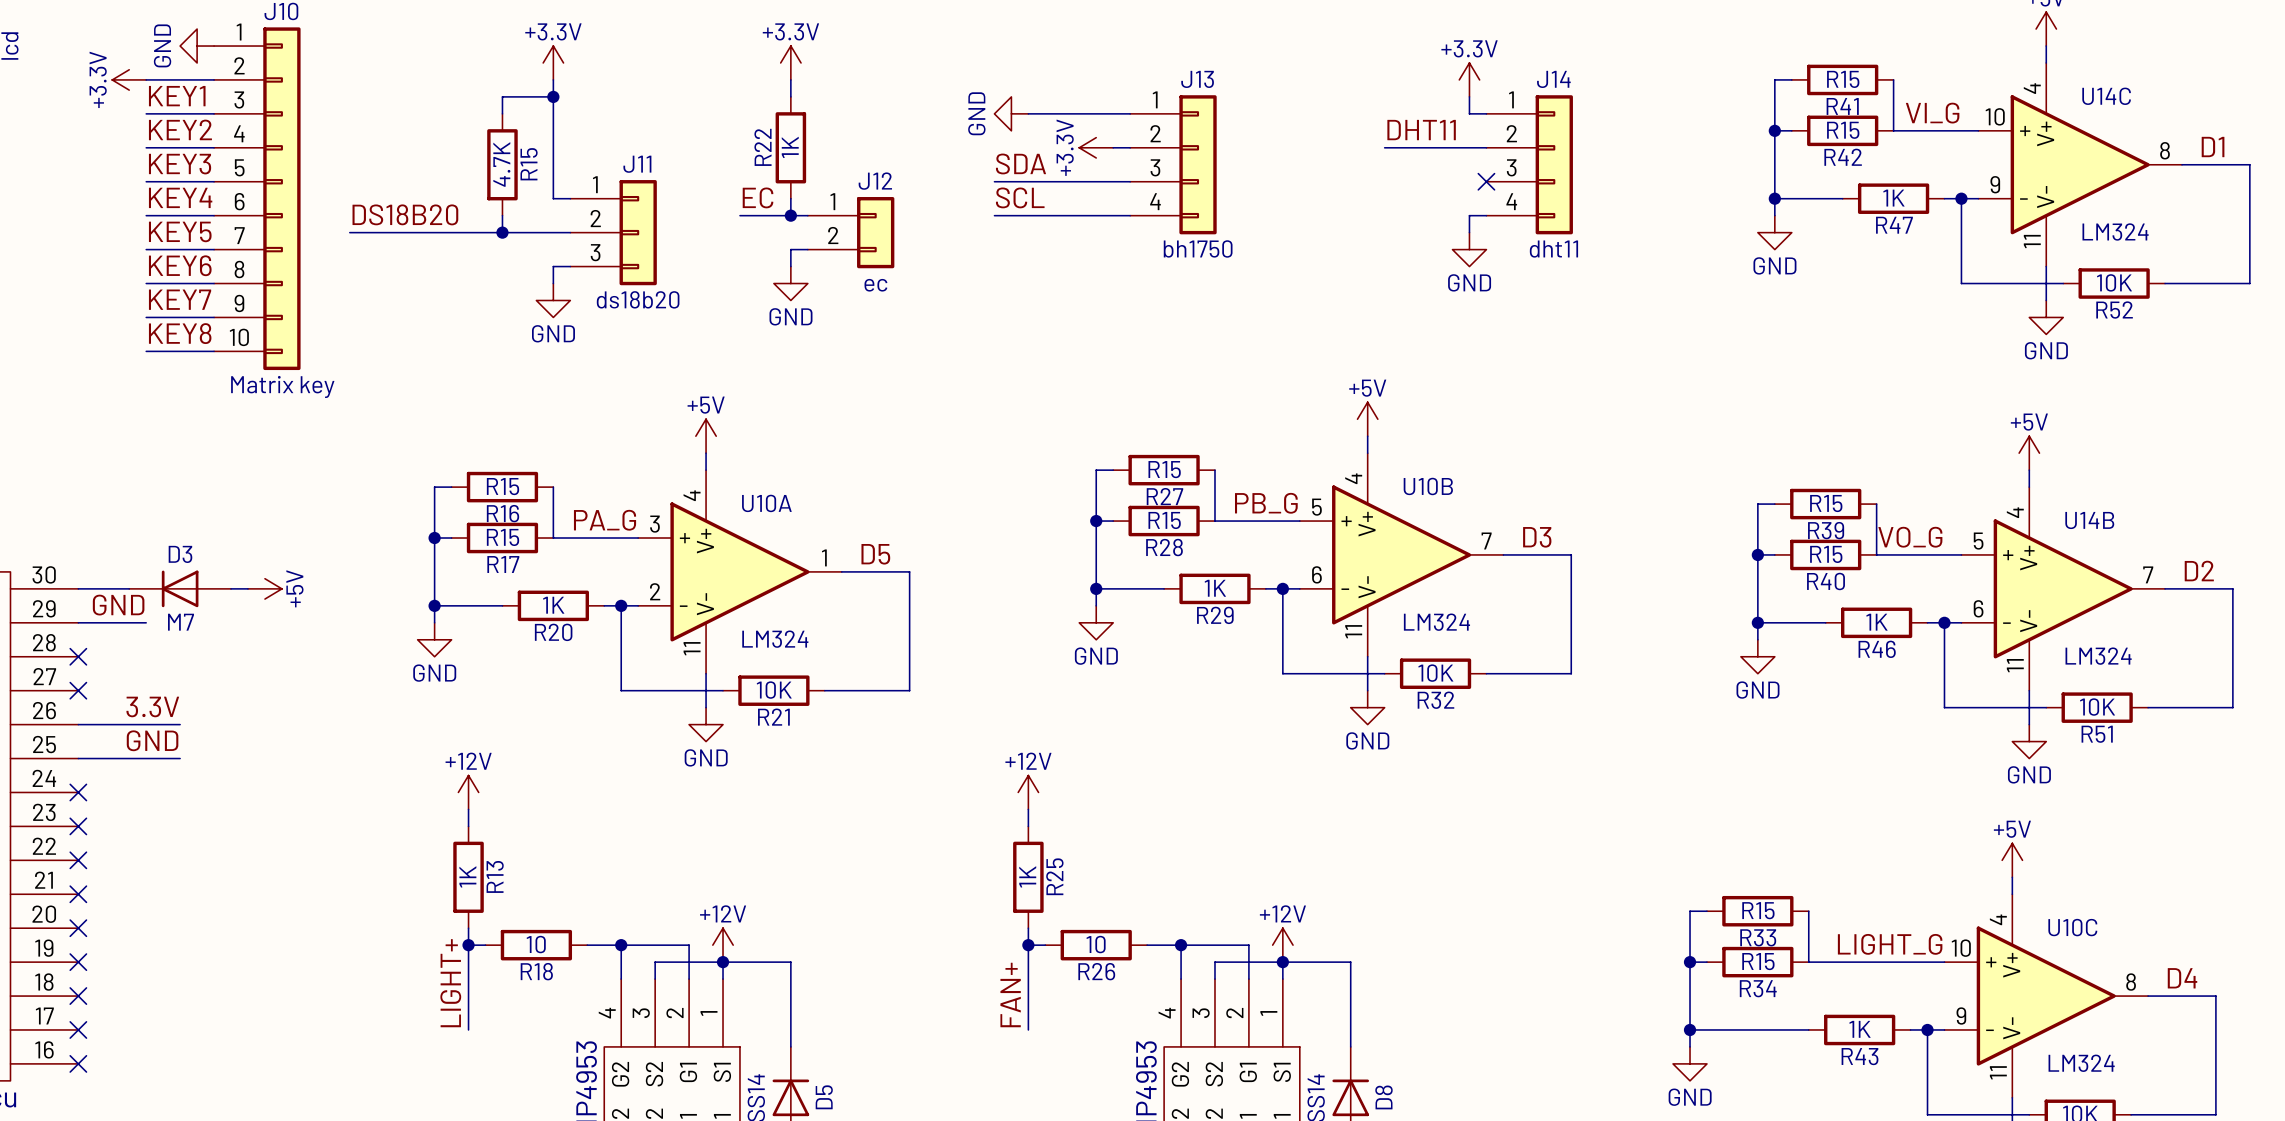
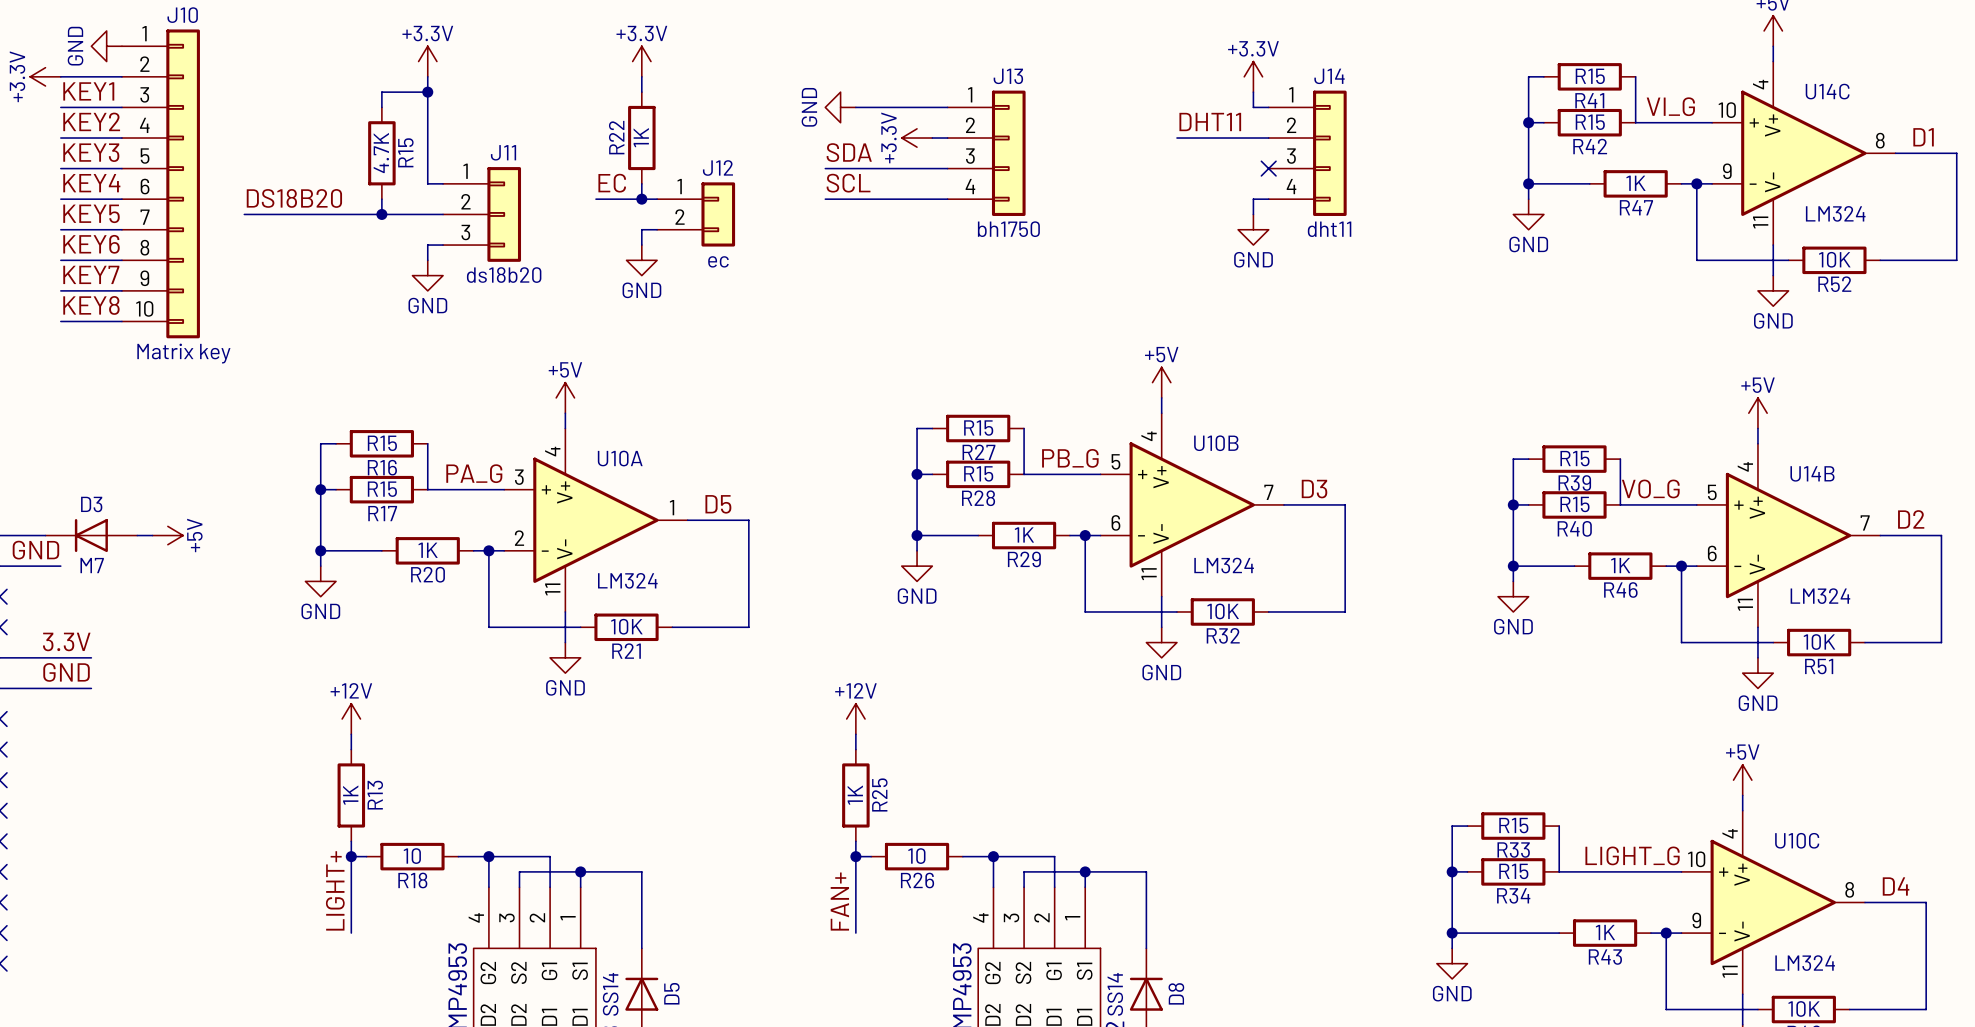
power symbol: +12V (723, 945) -> none
power symbol: +12V (1282, 945) -> none

